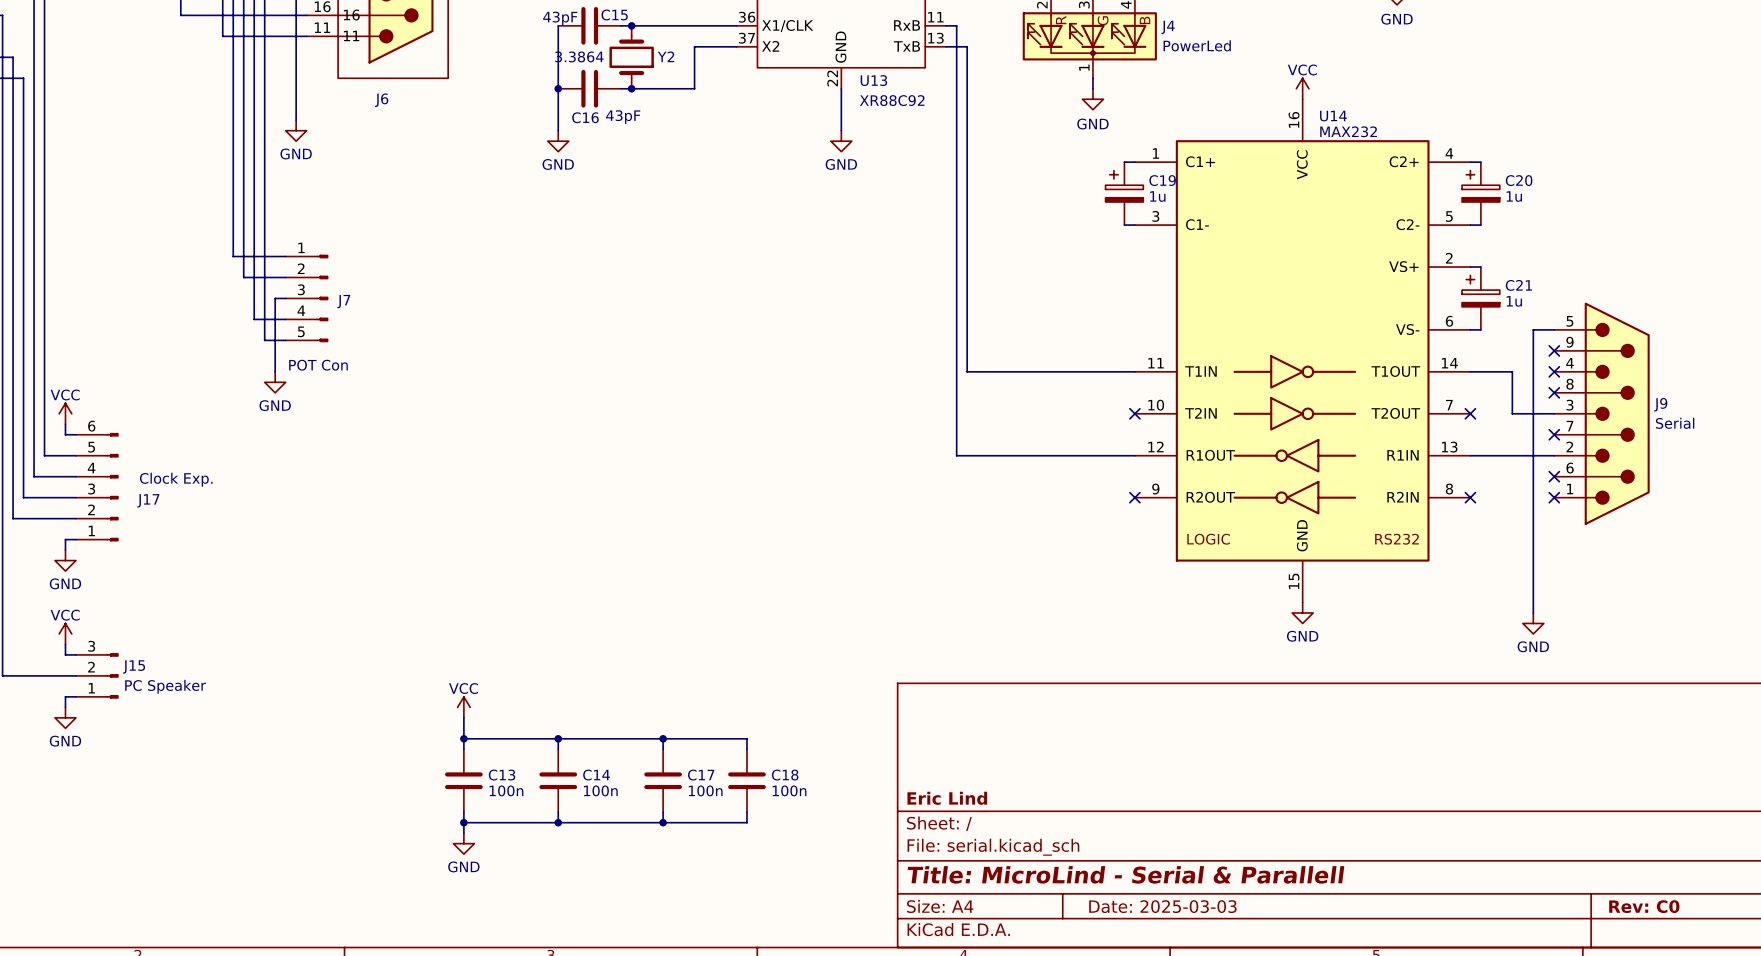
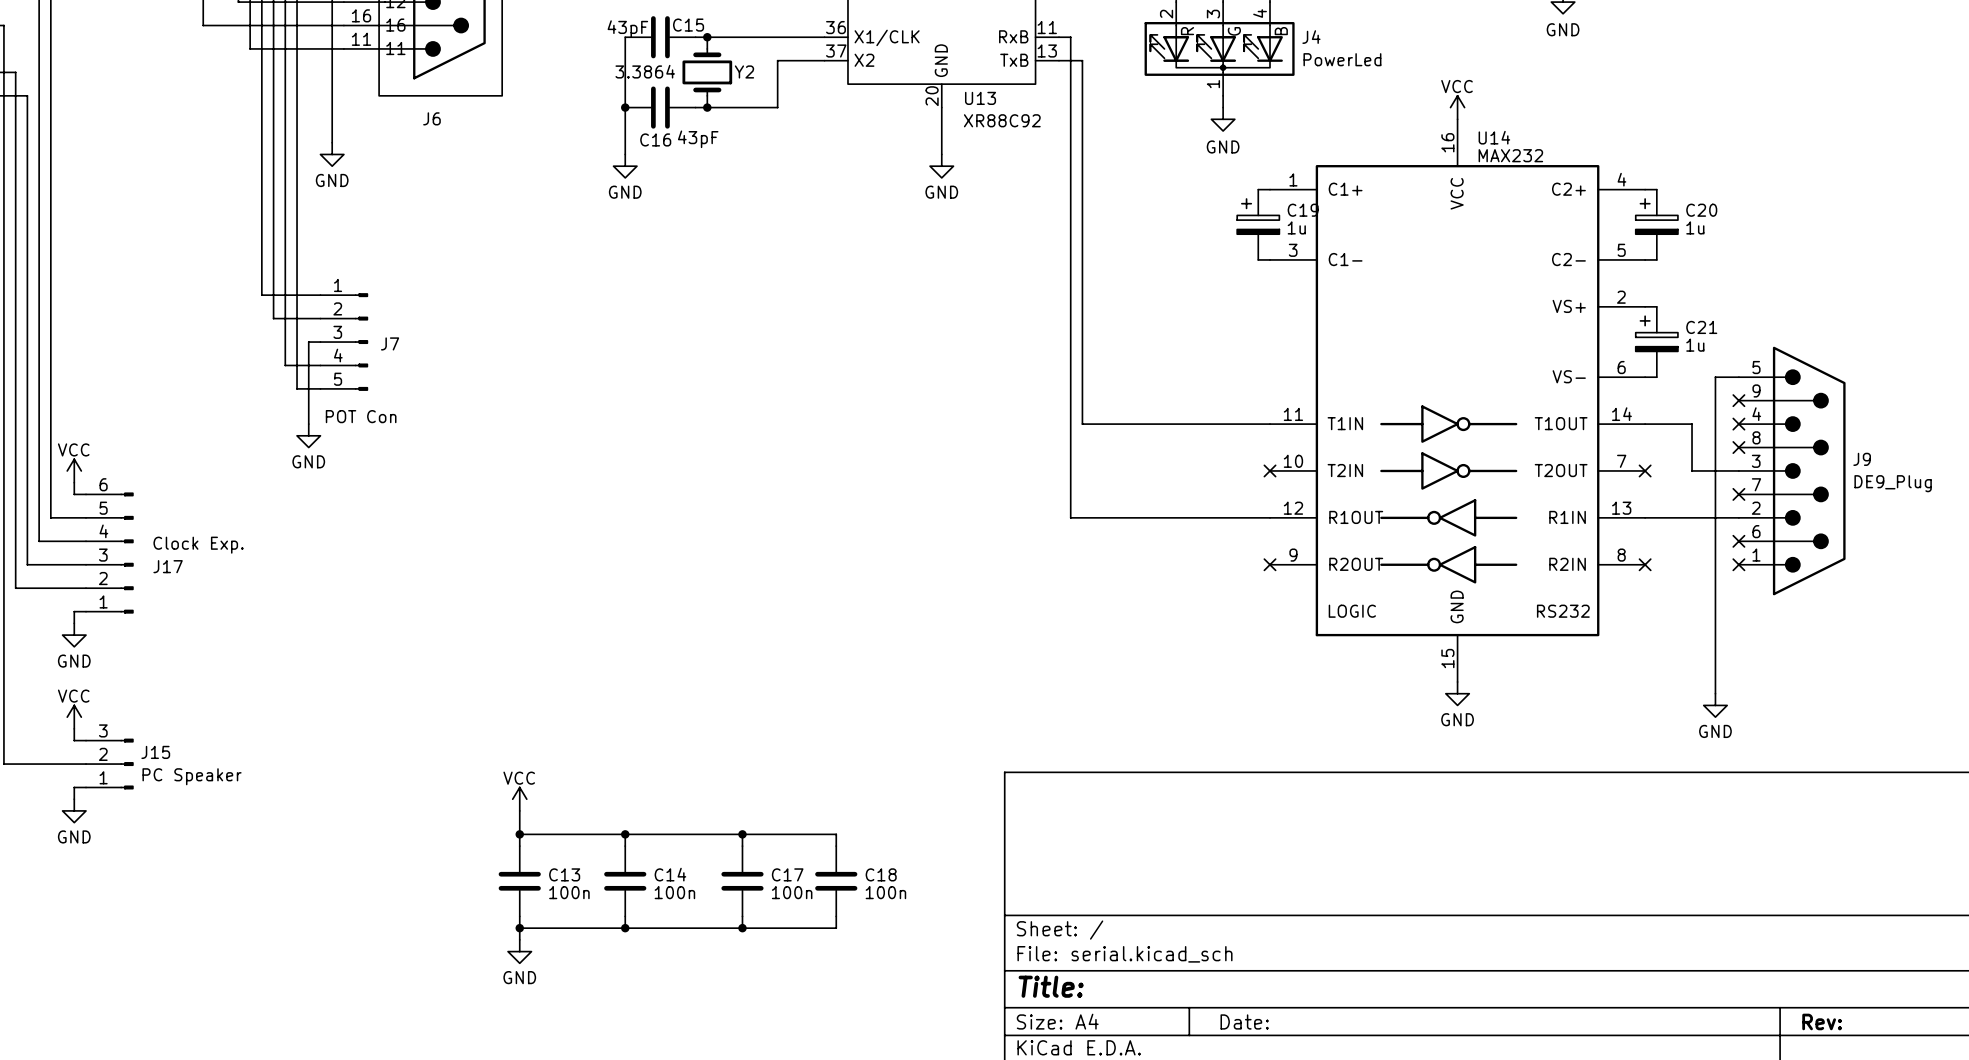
U13 pin number: 22 (832, 78) -> 20 (932, 96)
J9 value: Serial (1675, 423) -> DE9_Plug (1893, 483)
title block: Eric Lind (947, 798) -> none
title block: Title: MicroLind - Serial & Parallell (1125, 874) -> Title: (1051, 986)
title block: Date: 2025-03-03 (1162, 906) -> Date: (1244, 1021)
title block: Rev: C0 (1644, 906) -> Rev: (1822, 1021)

